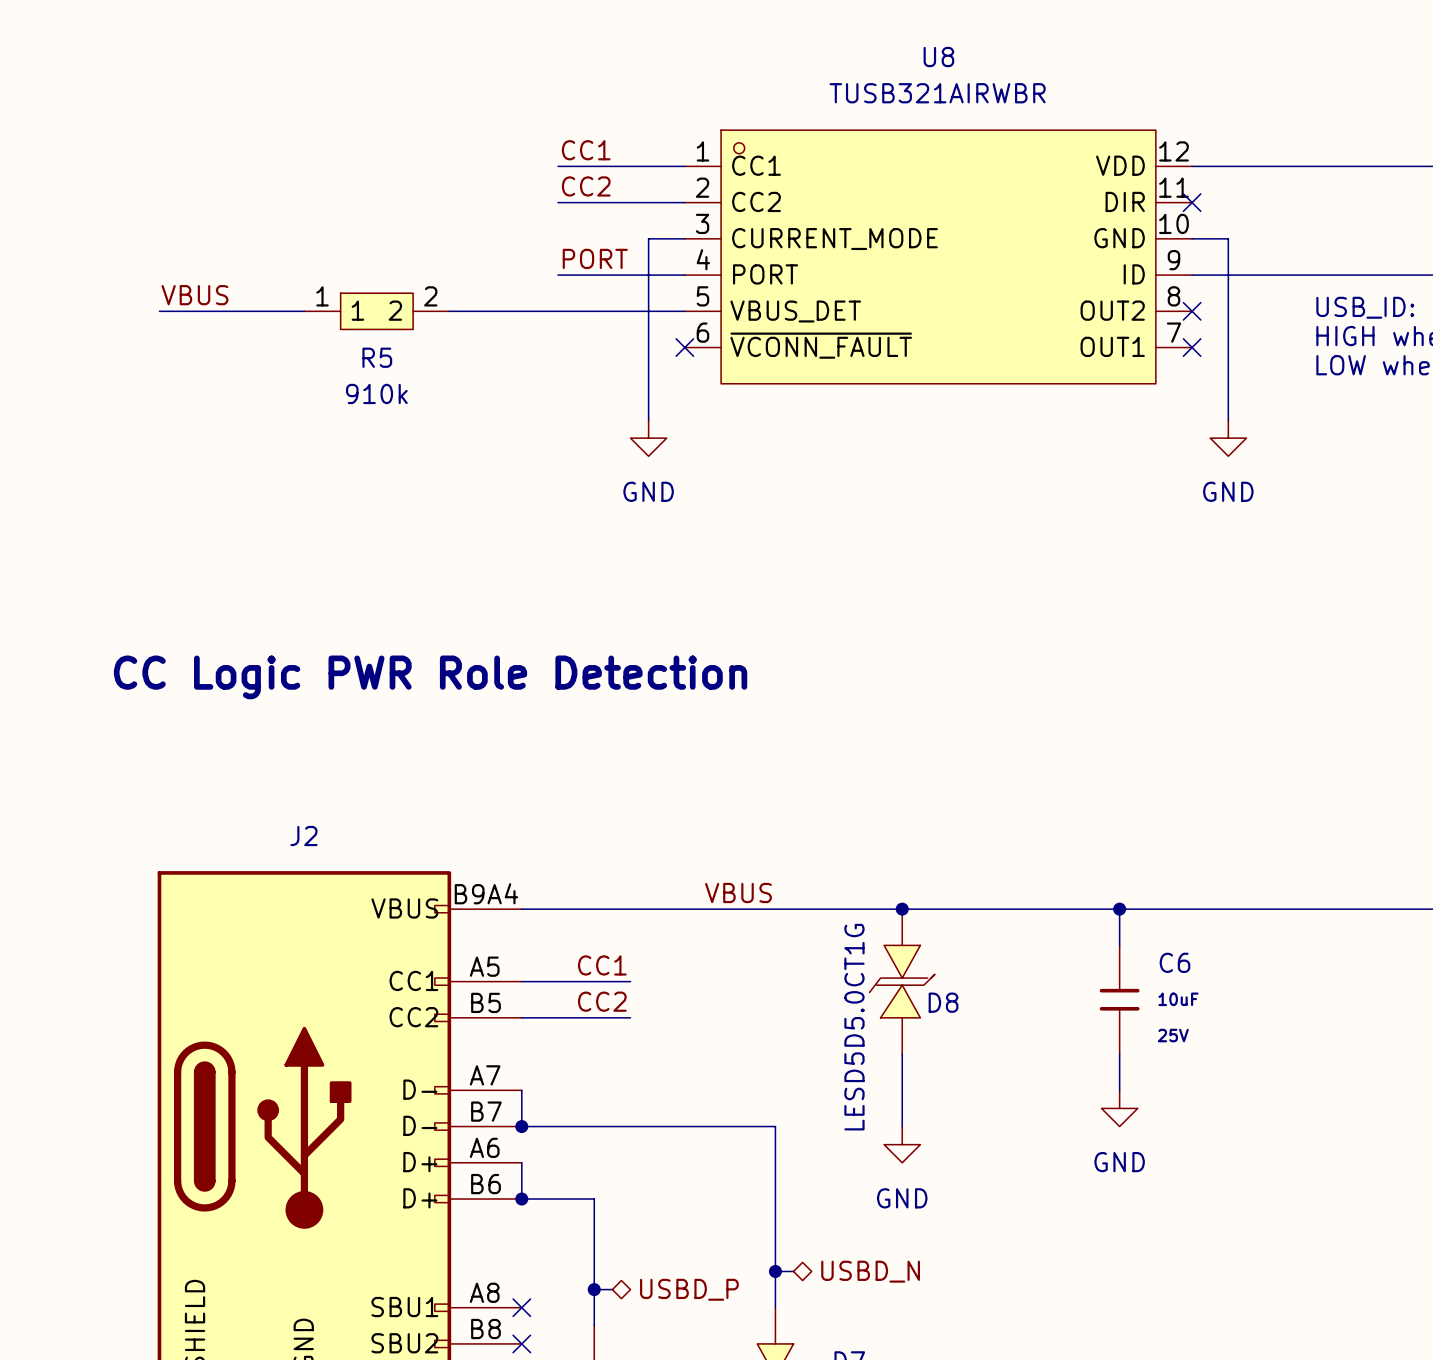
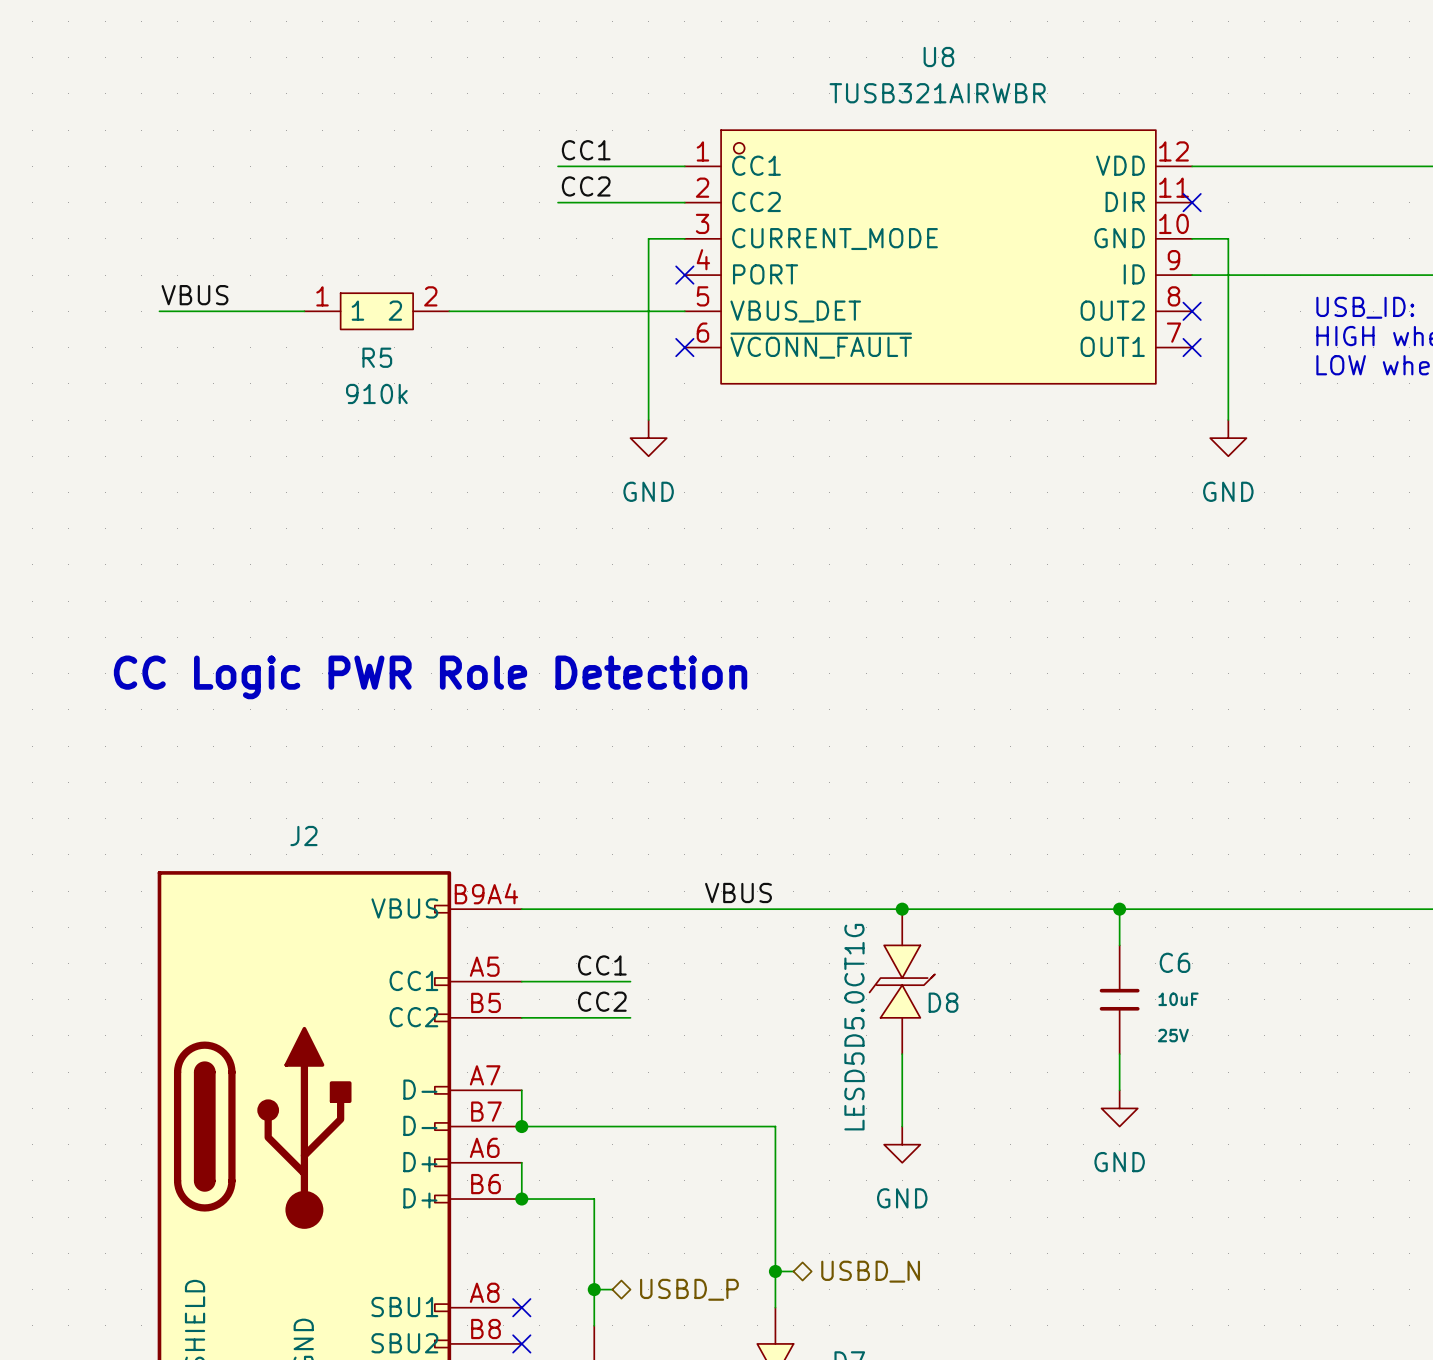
label: PORT (595, 258) -> none
wire: (558, 275) (684, 275) -> none
no-connect mark: none -> (684, 275)

